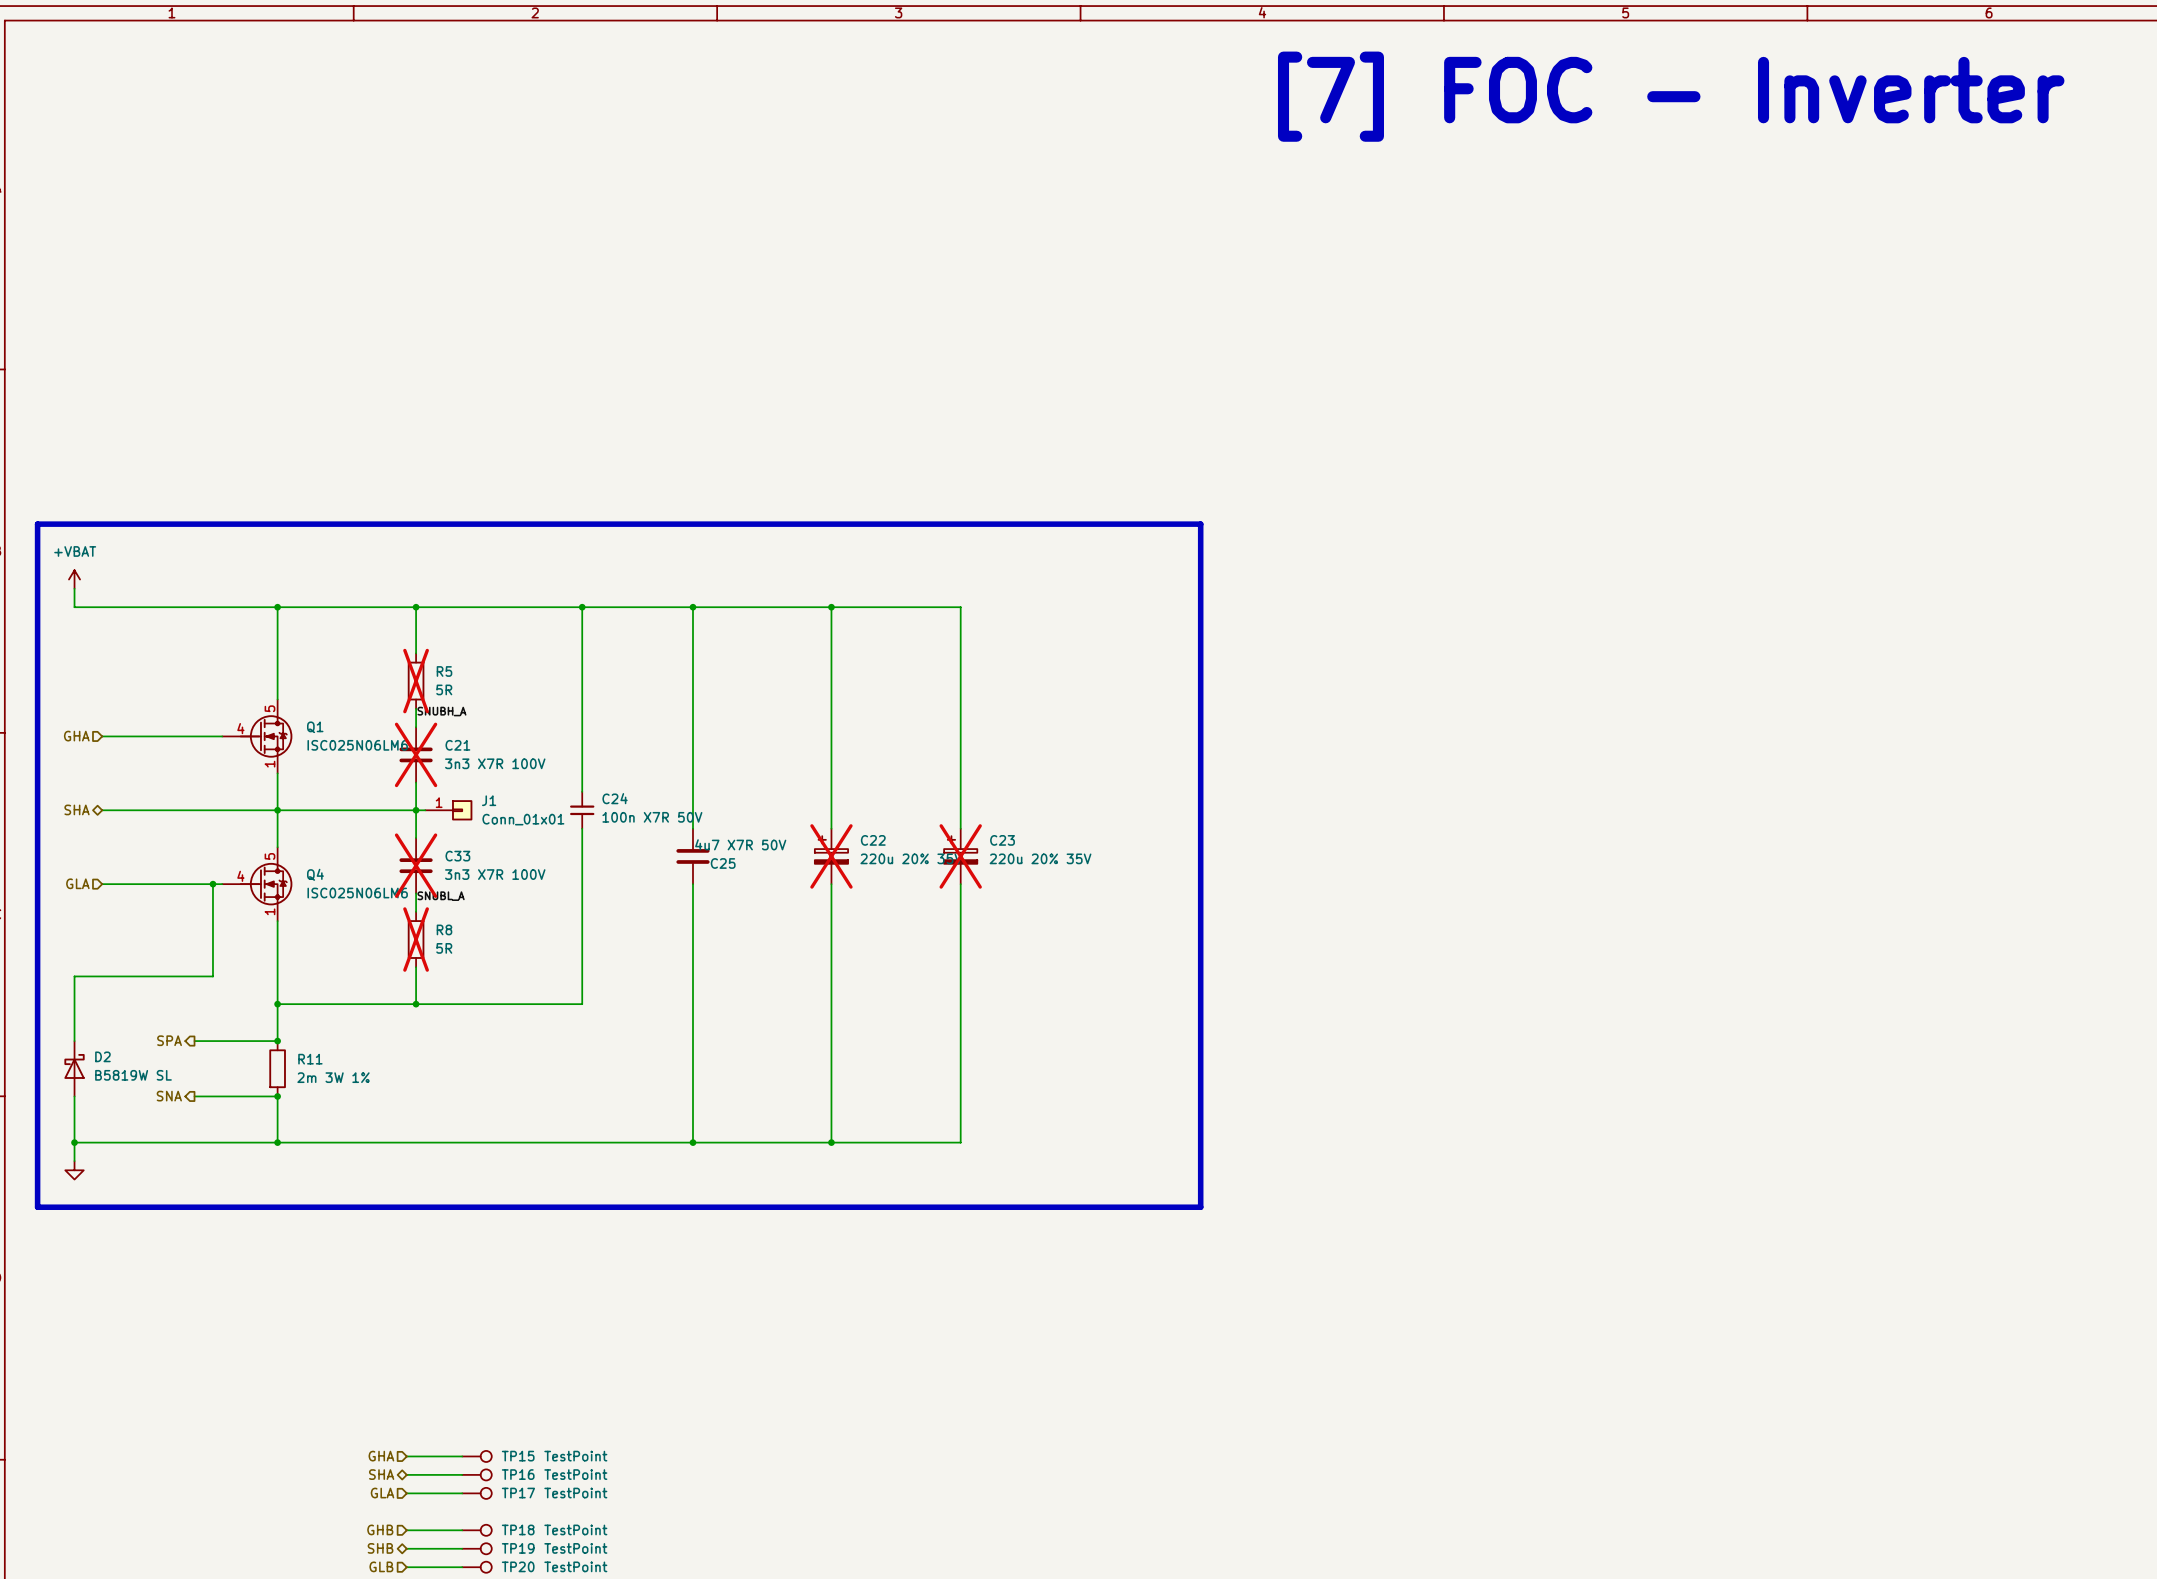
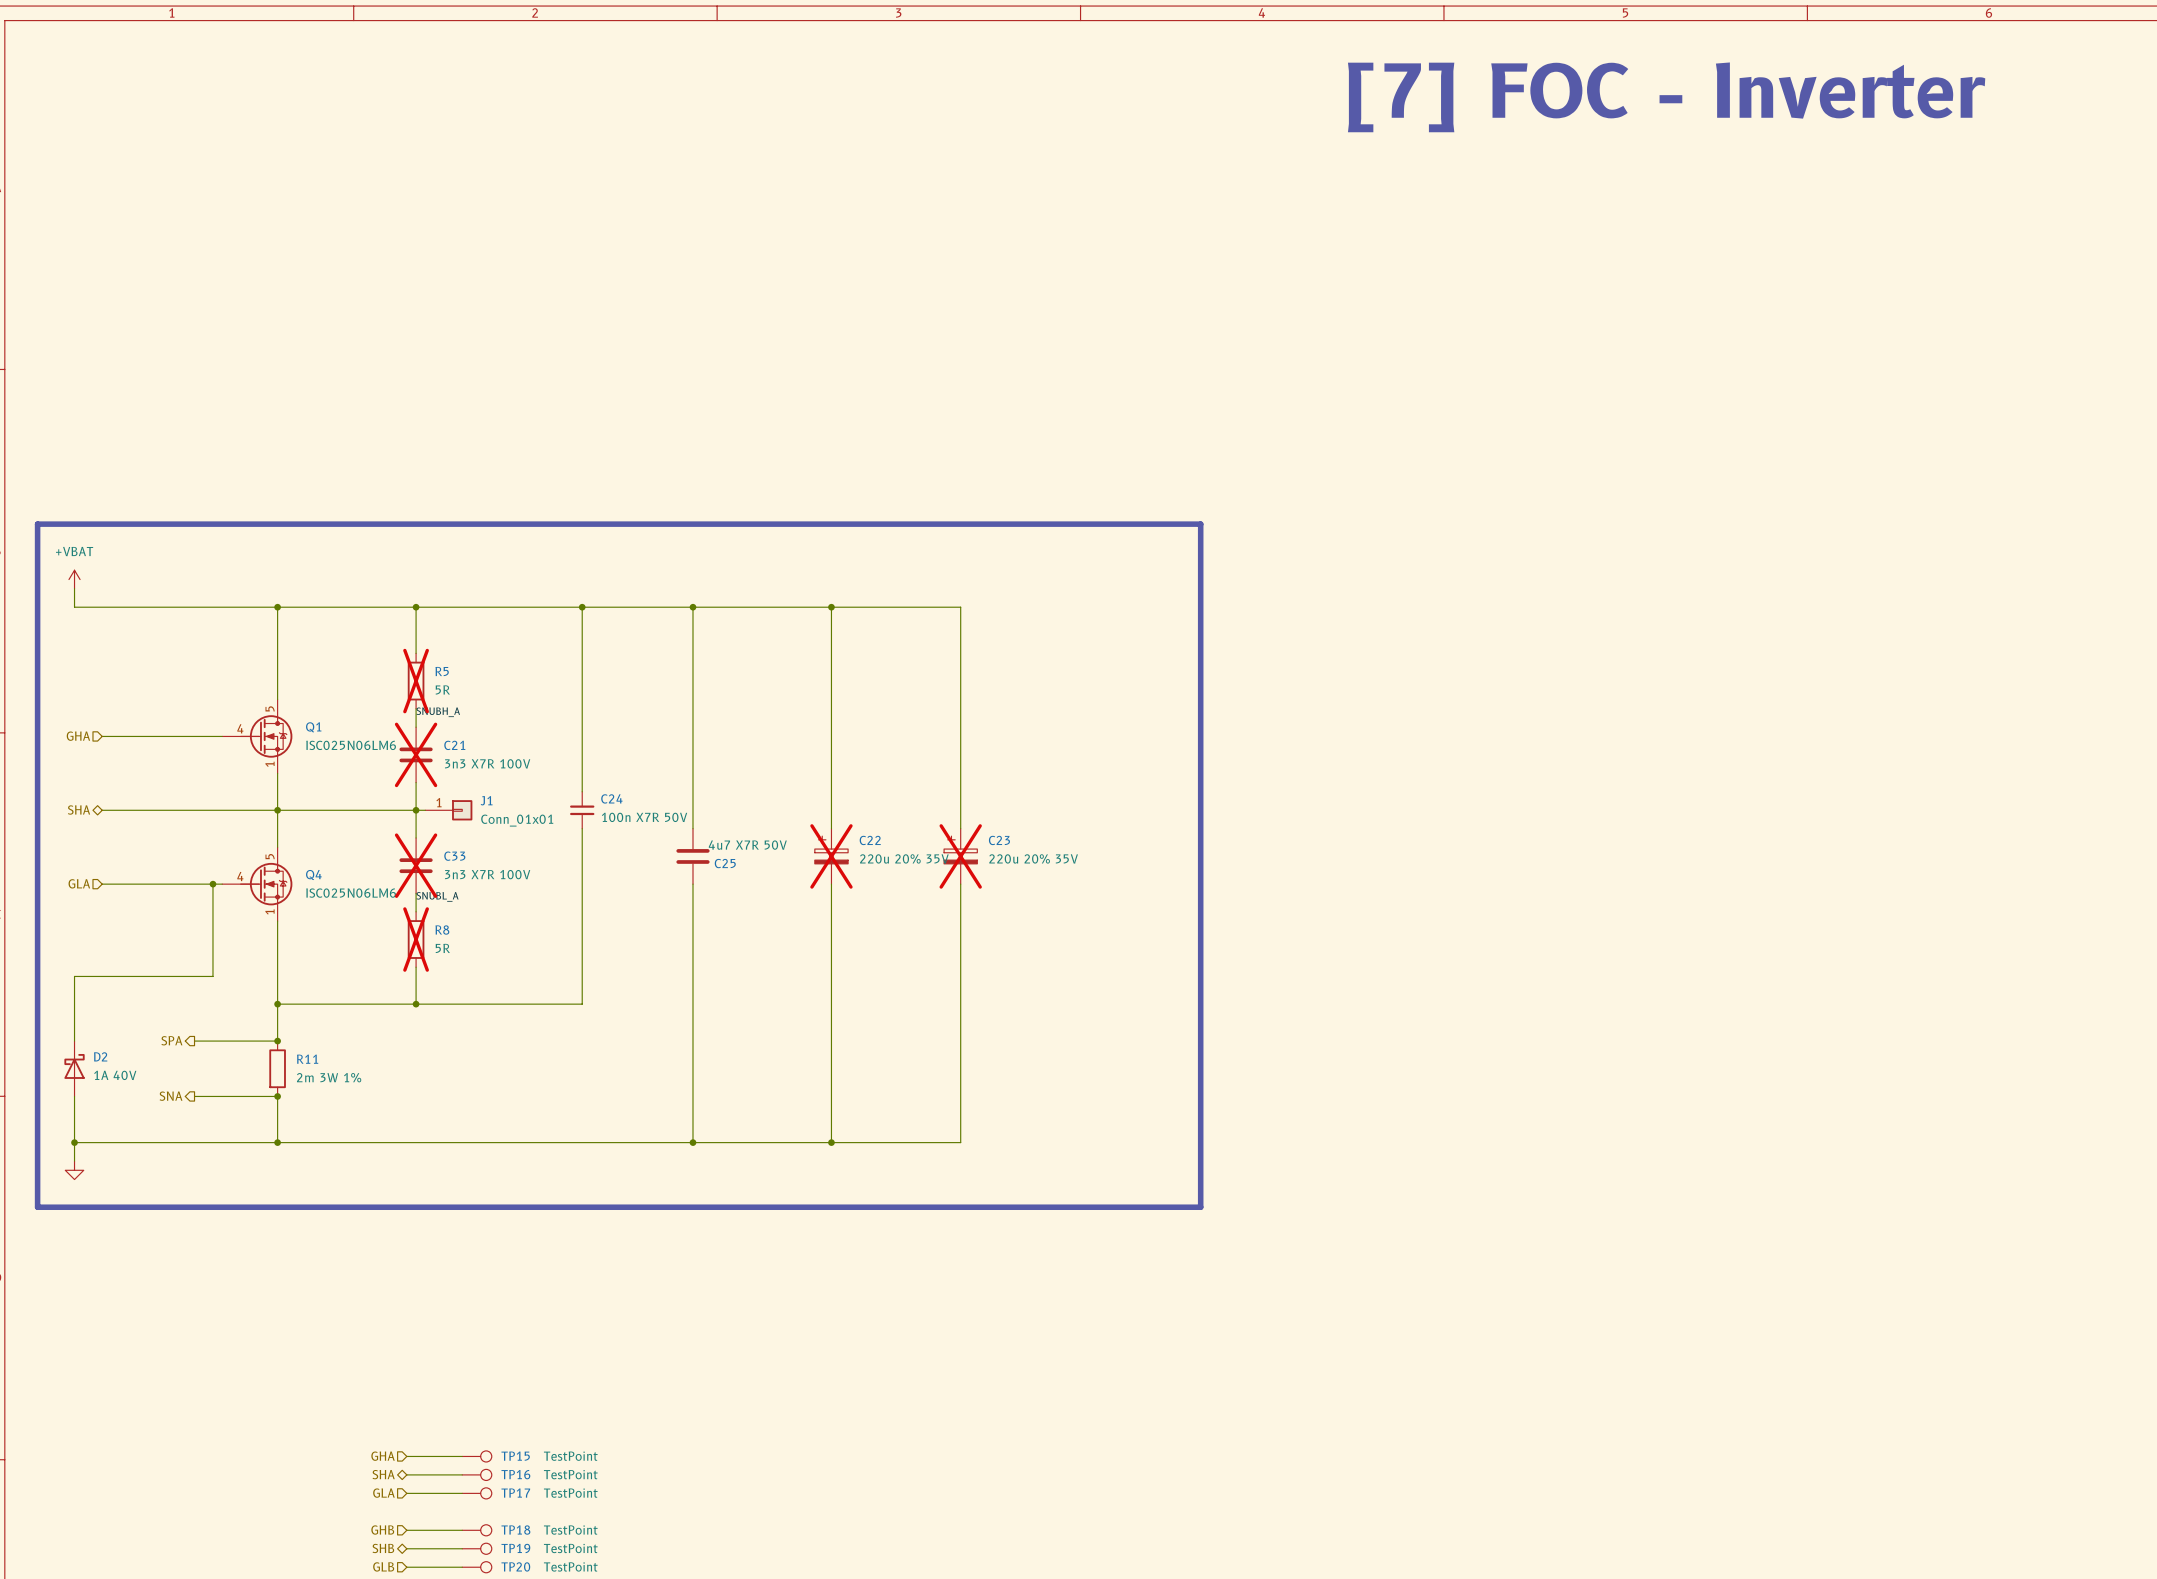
D2 value: B5819W SL (133, 1075) -> 1A 40V (115, 1075)

